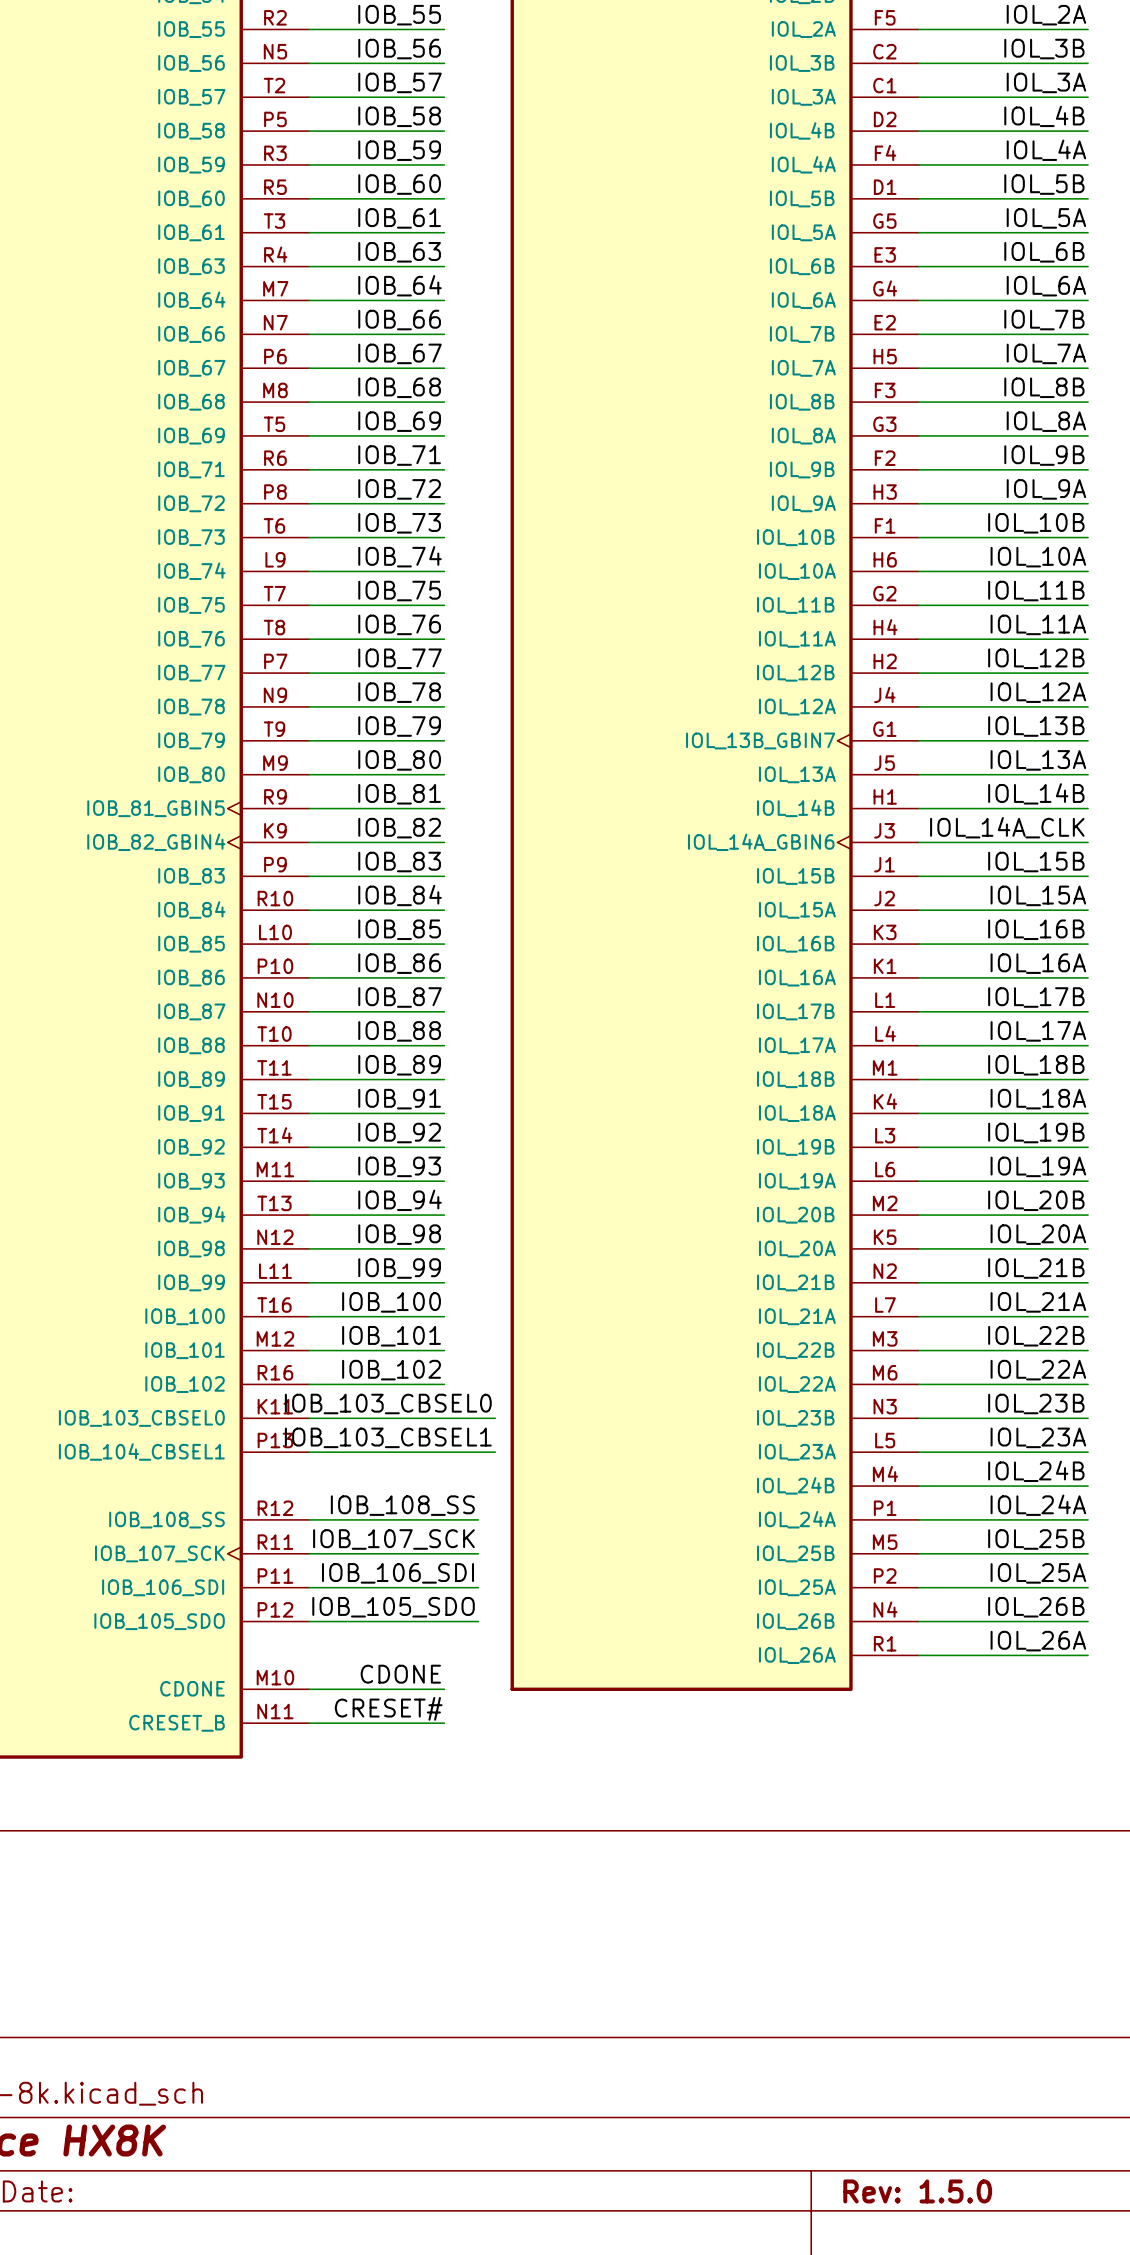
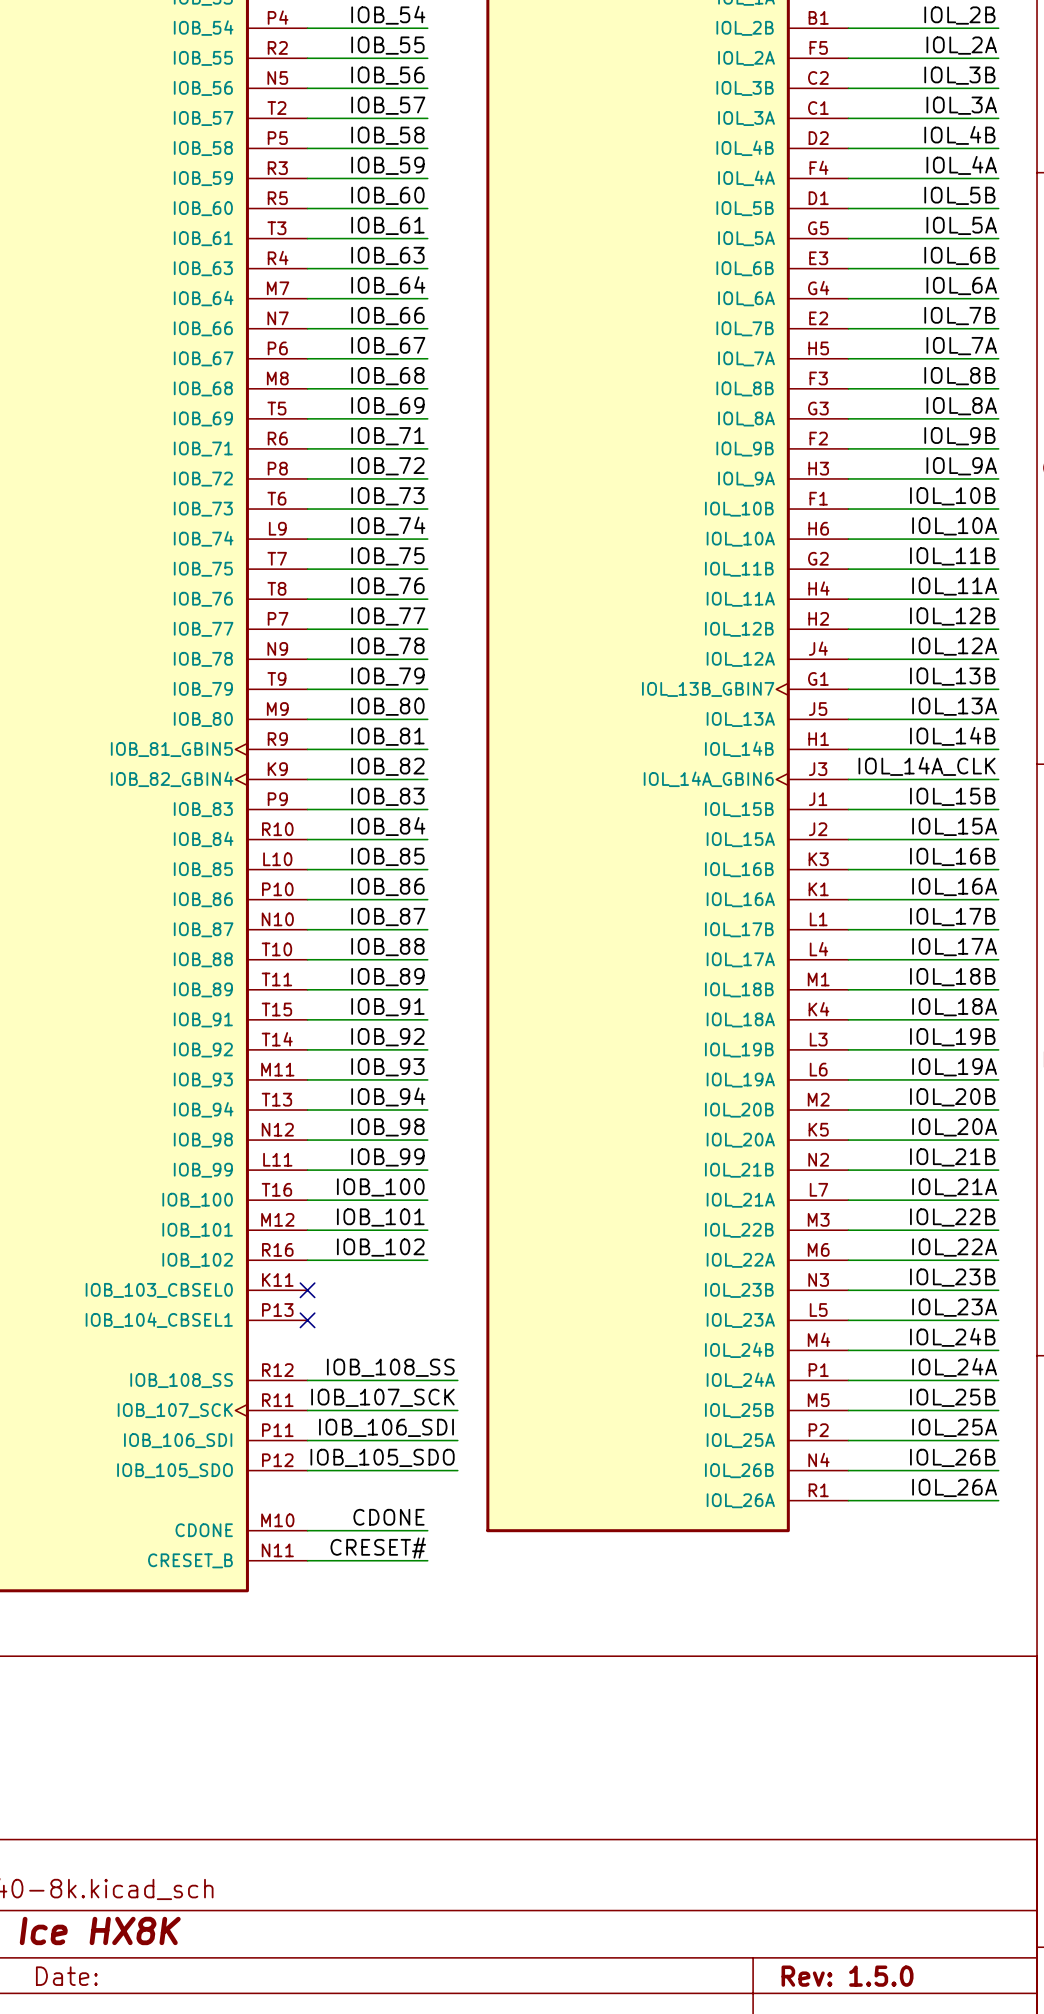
label: IOB_103_CBSEL0 (388, 1403) -> none
wire: (308, 1418) (495, 1418) -> none
no-connect mark: none -> (307, 1290)
label: IOB_103_CBSEL1 (388, 1437) -> none
wire: (308, 1452) (495, 1452) -> none
no-connect mark: none -> (307, 1320)

